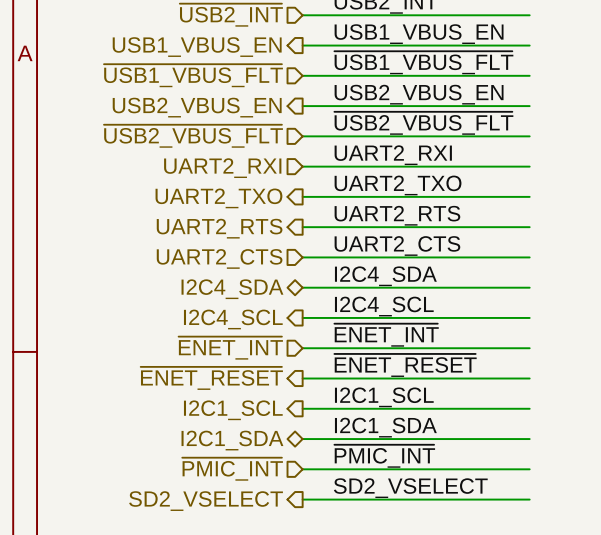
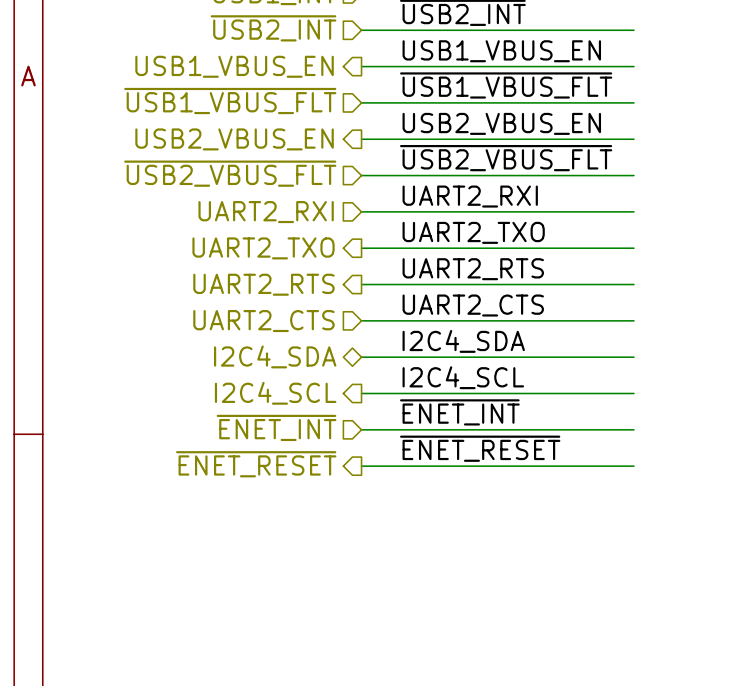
label: I2C1_SCL (384, 397) -> none
wire: (302, 408) (529, 408) -> none
hierarchical label: I2C1_SCL (233, 410) -> none
label: I2C1_SDA (385, 427) -> none
wire: (302, 439) (529, 439) -> none
hierarchical label: I2C1_SDA (232, 440) -> none
label: ~{PMIC_INT} (384, 456) -> none
hierarchical label: ~{PMIC_INT} (232, 469) -> none
wire: (302, 469) (529, 469) -> none
label: SD2_VSELECT (410, 488) -> none
wire: (302, 499) (529, 499) -> none
hierarchical label: SD2_VSELECT (206, 501) -> none

